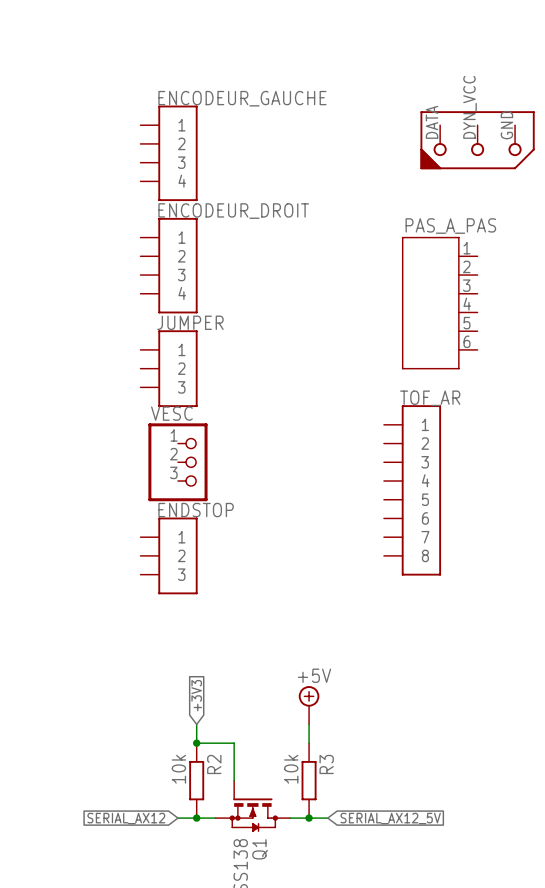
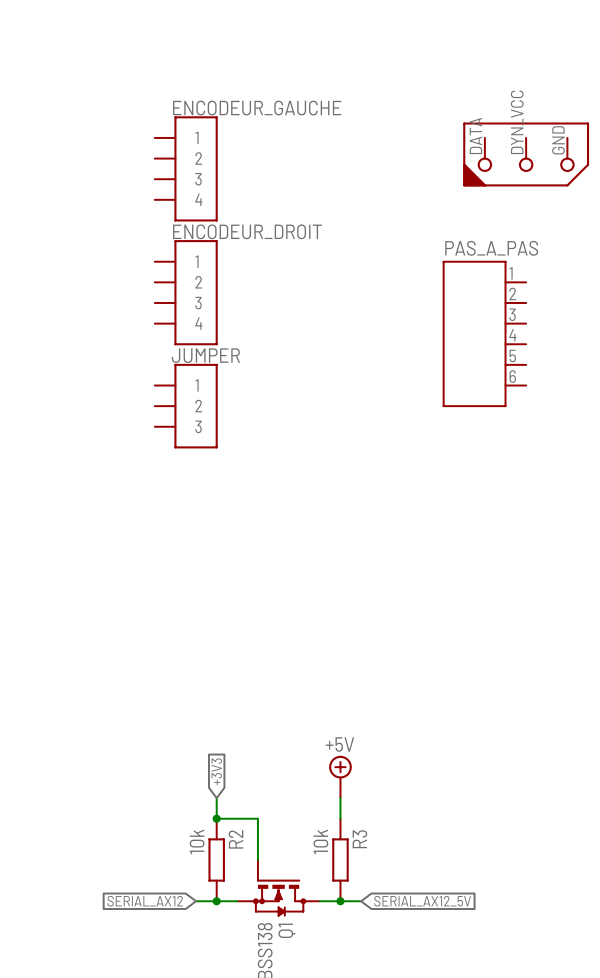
VESC: (177, 462) -> none
TOF_AR: (412, 490) -> none
ENDSTOP: (169, 555) -> none

